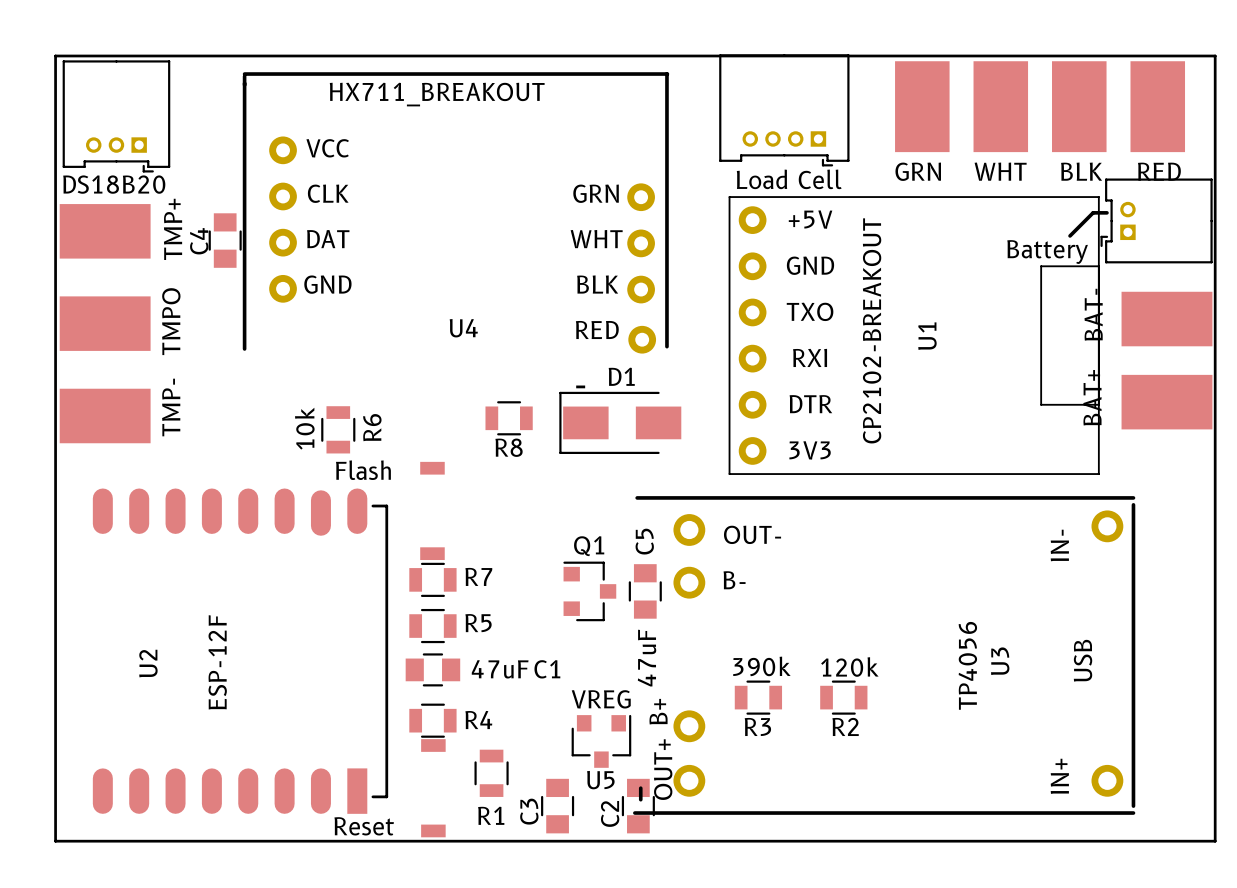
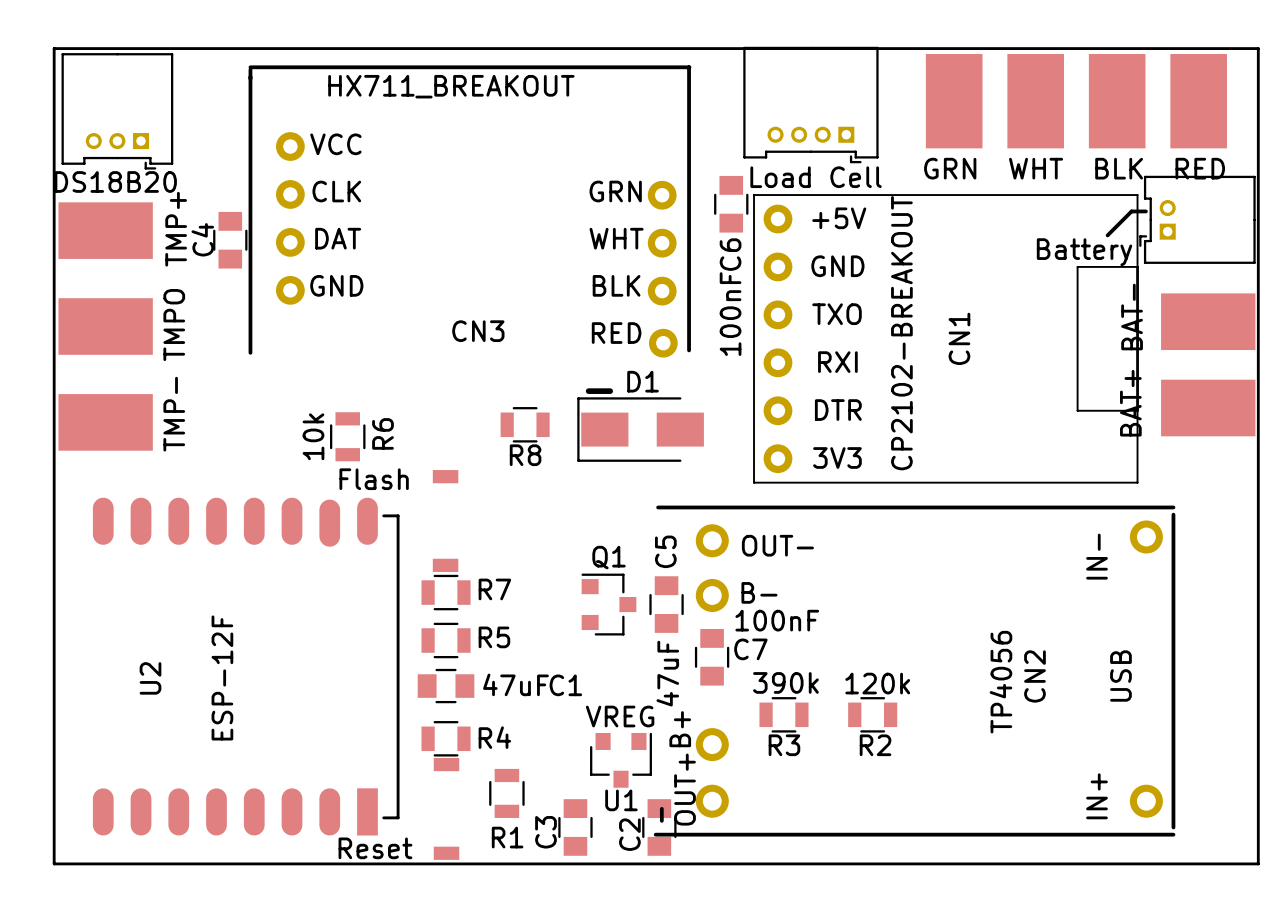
C6: none -> 100nF (731, 204)
U4 name: U4 (463, 328) -> CN3 (478, 331)
U1 name: U1 (927, 336) -> CN1 (959, 338)
C7: none -> 100nF (712, 657)
U3 name: U3 (1000, 661) -> CN2 (1034, 676)
U5 name: U5 (600, 780) -> U1 (621, 800)

